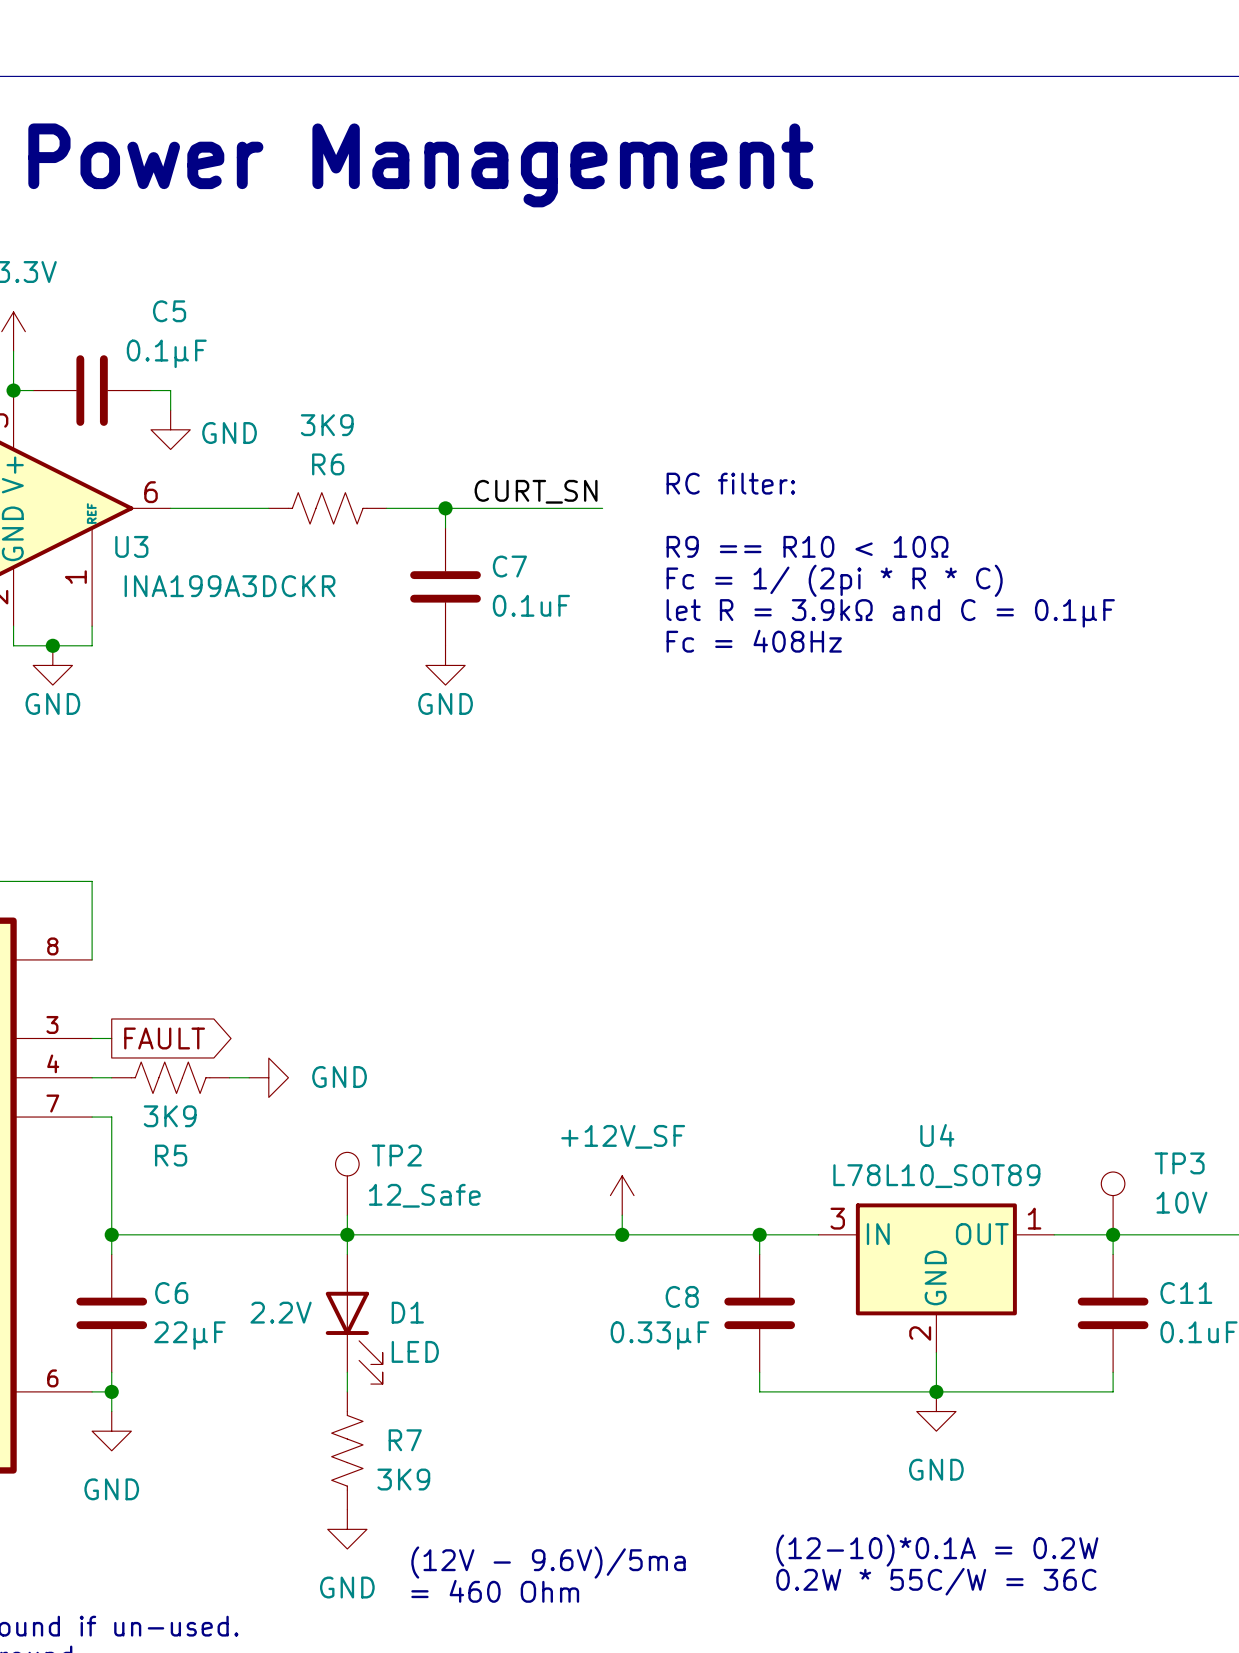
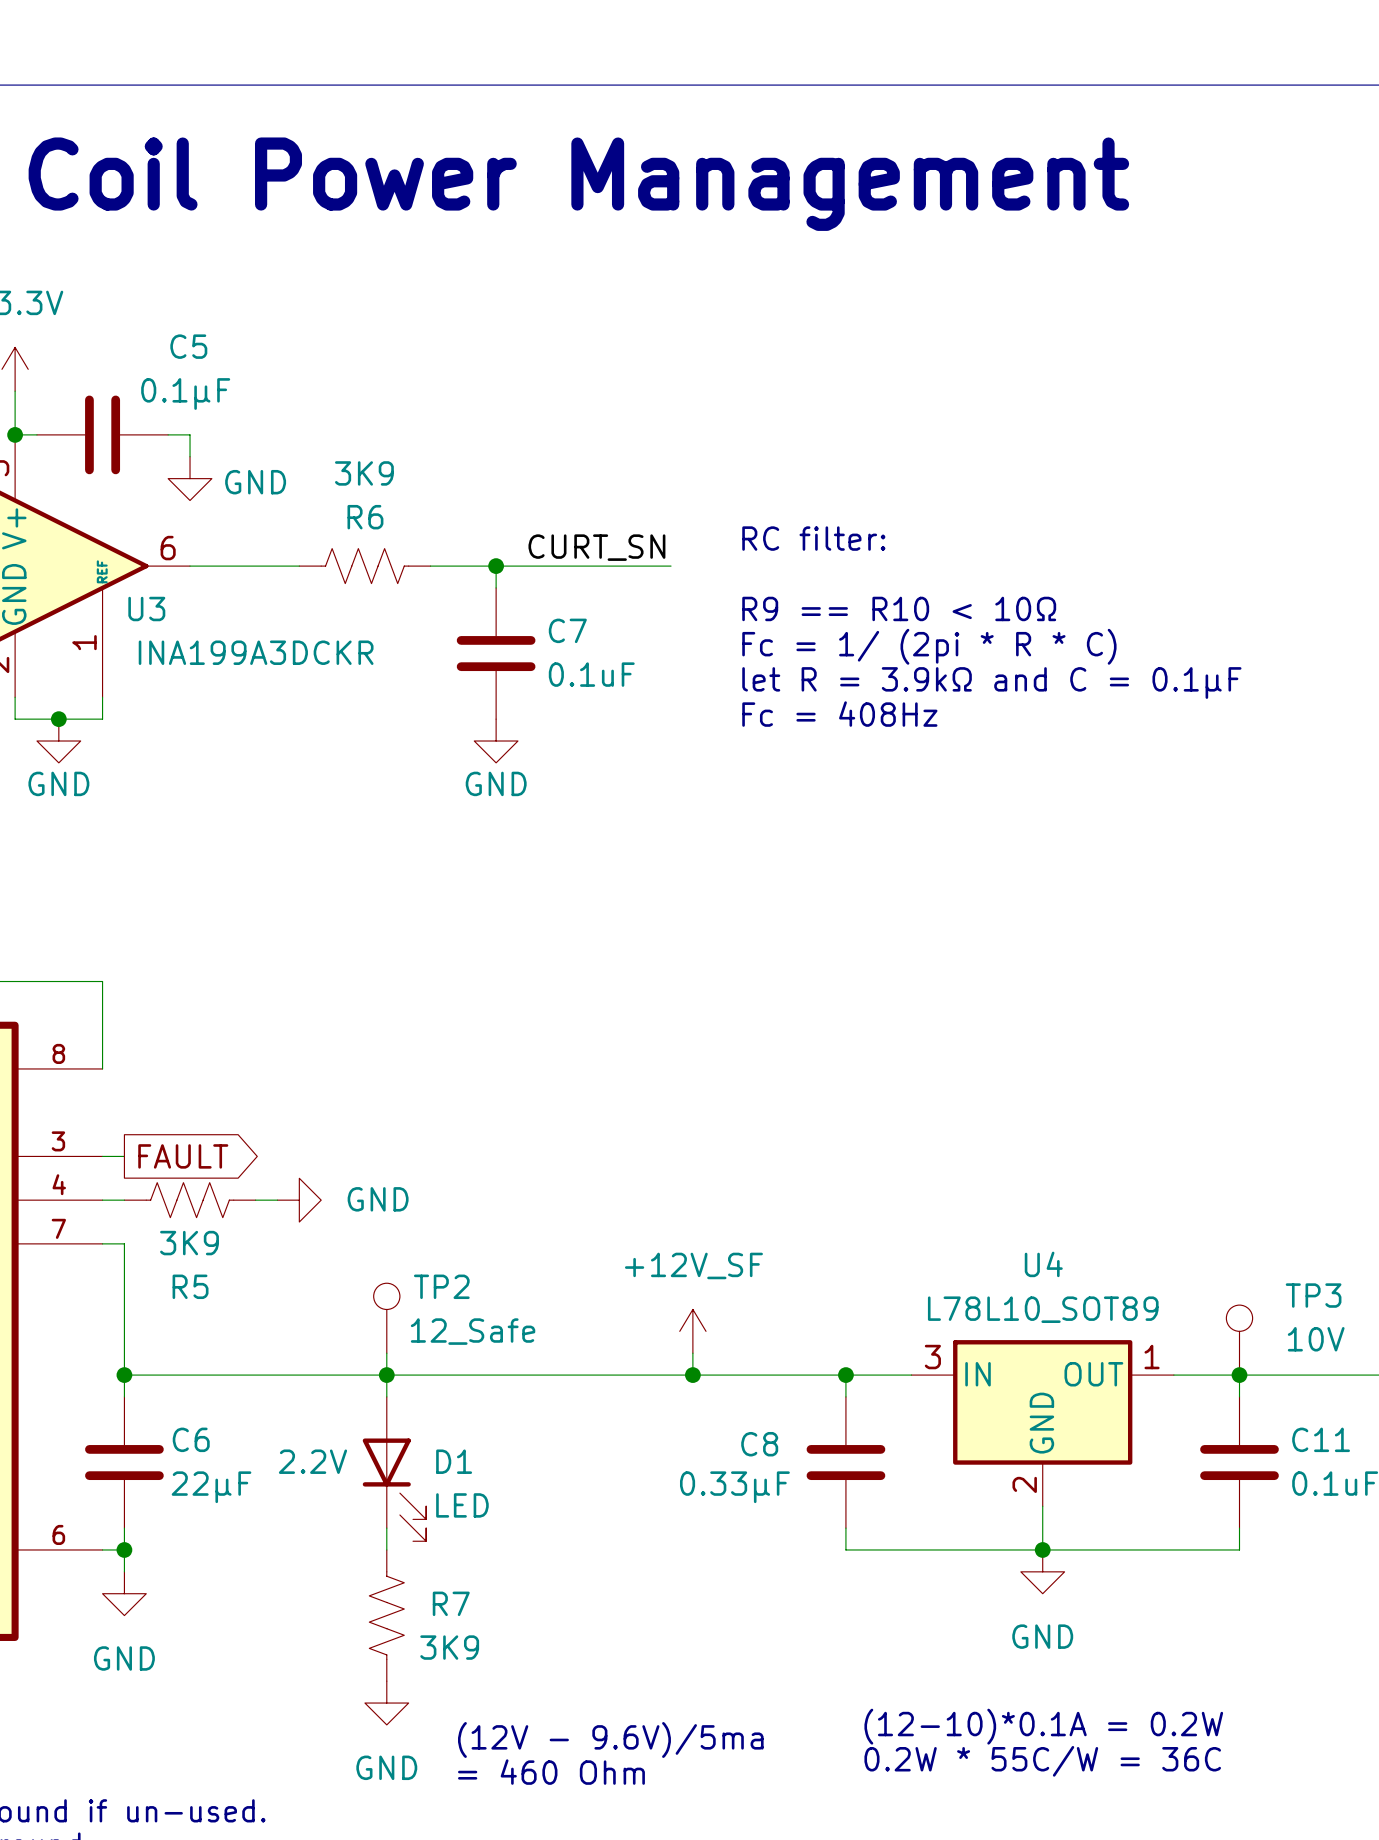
text: Power Management (420, 165) -> Coil Power Management (578, 184)

